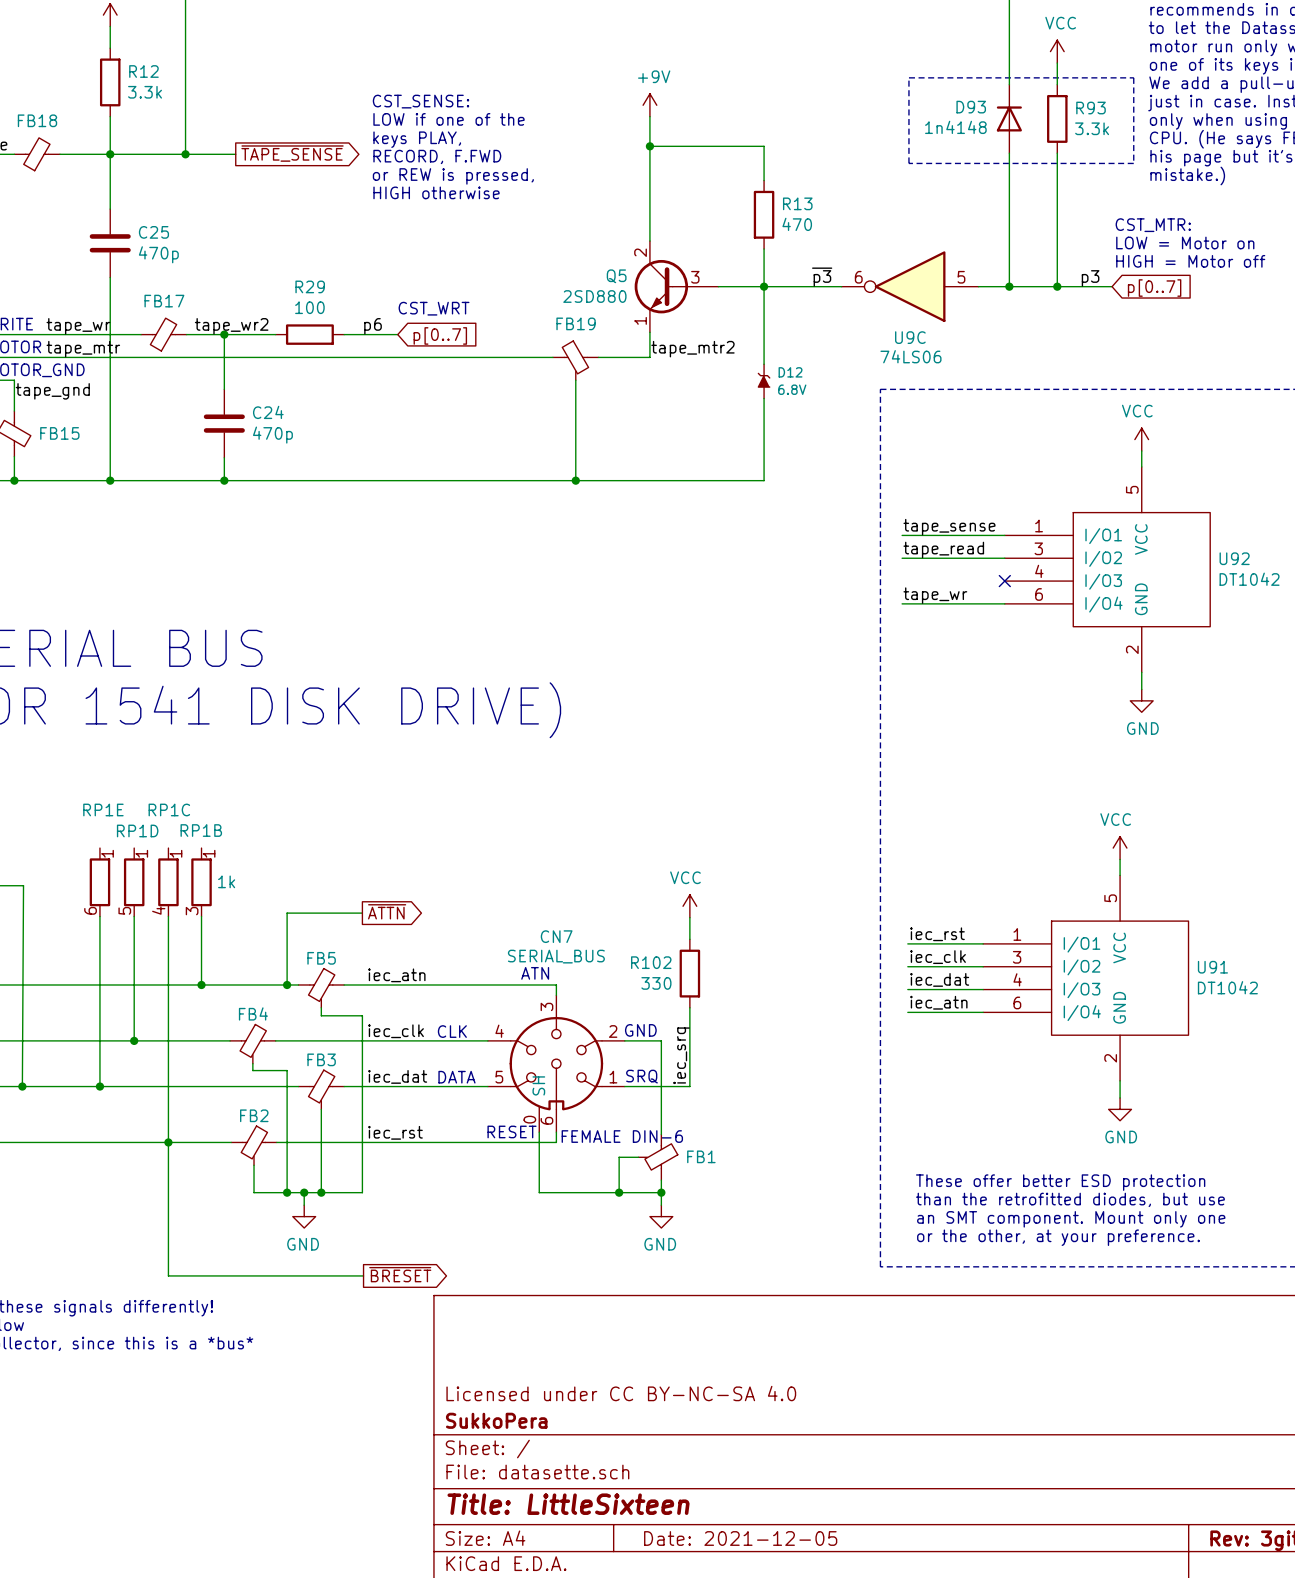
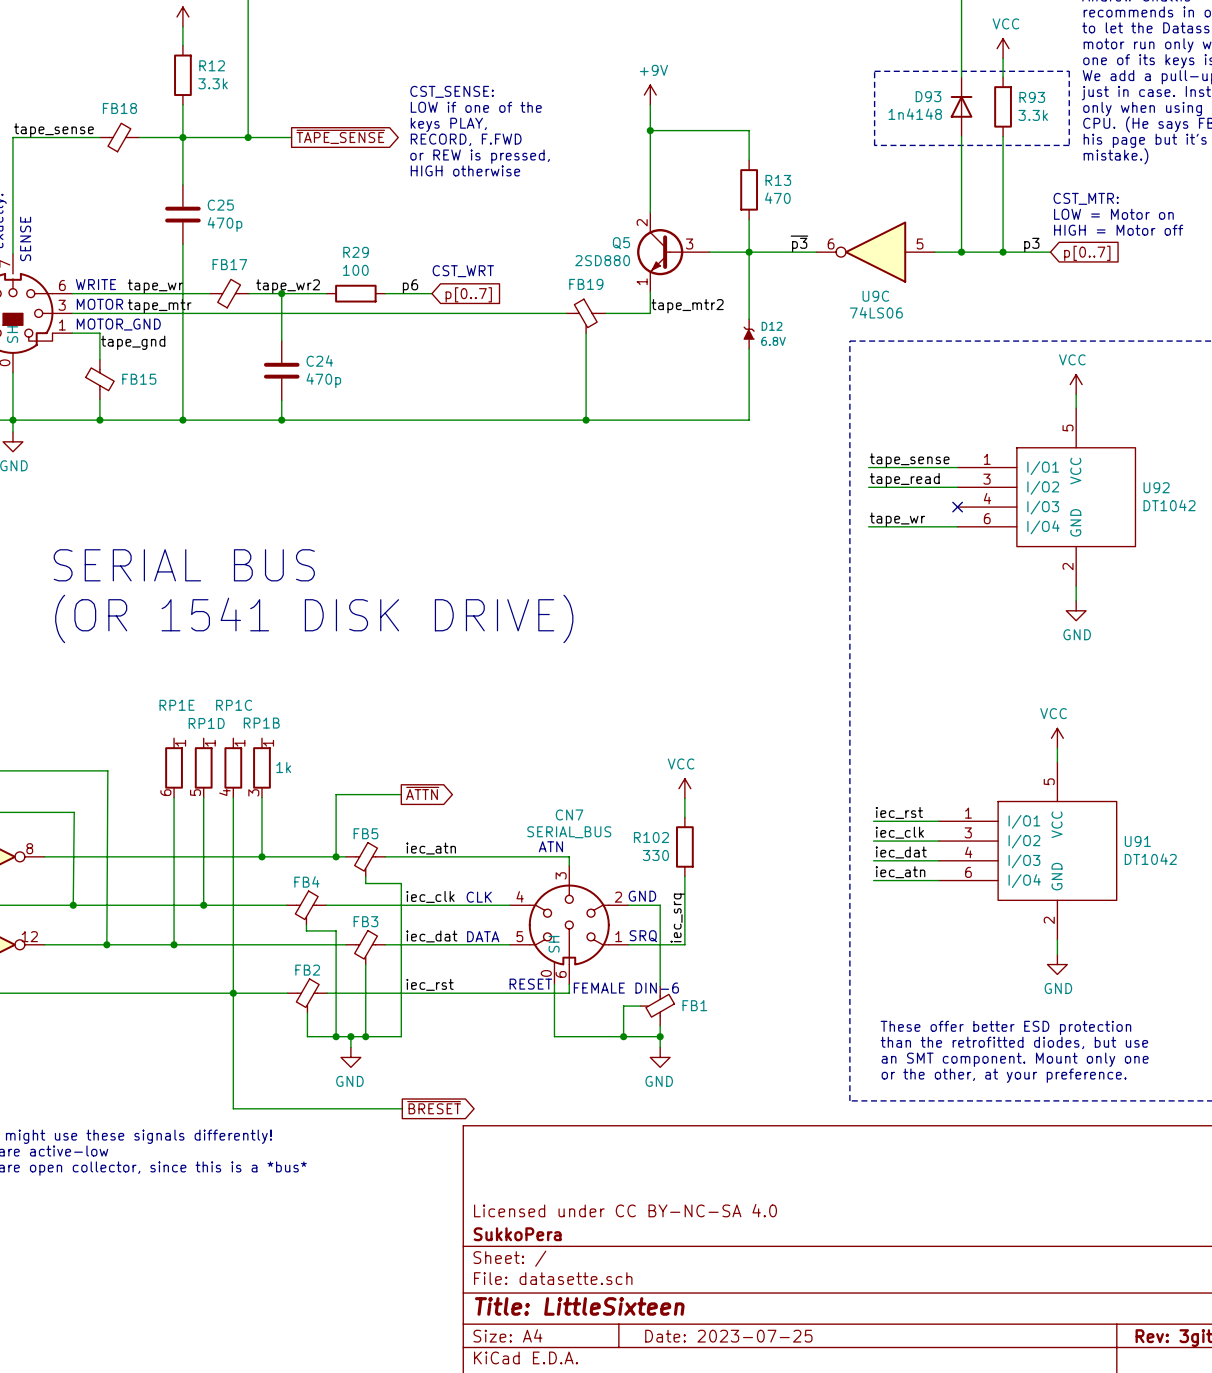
title block: Date: 2021-12-05 (740, 1538) -> Date: 2023-07-25 (728, 1336)

